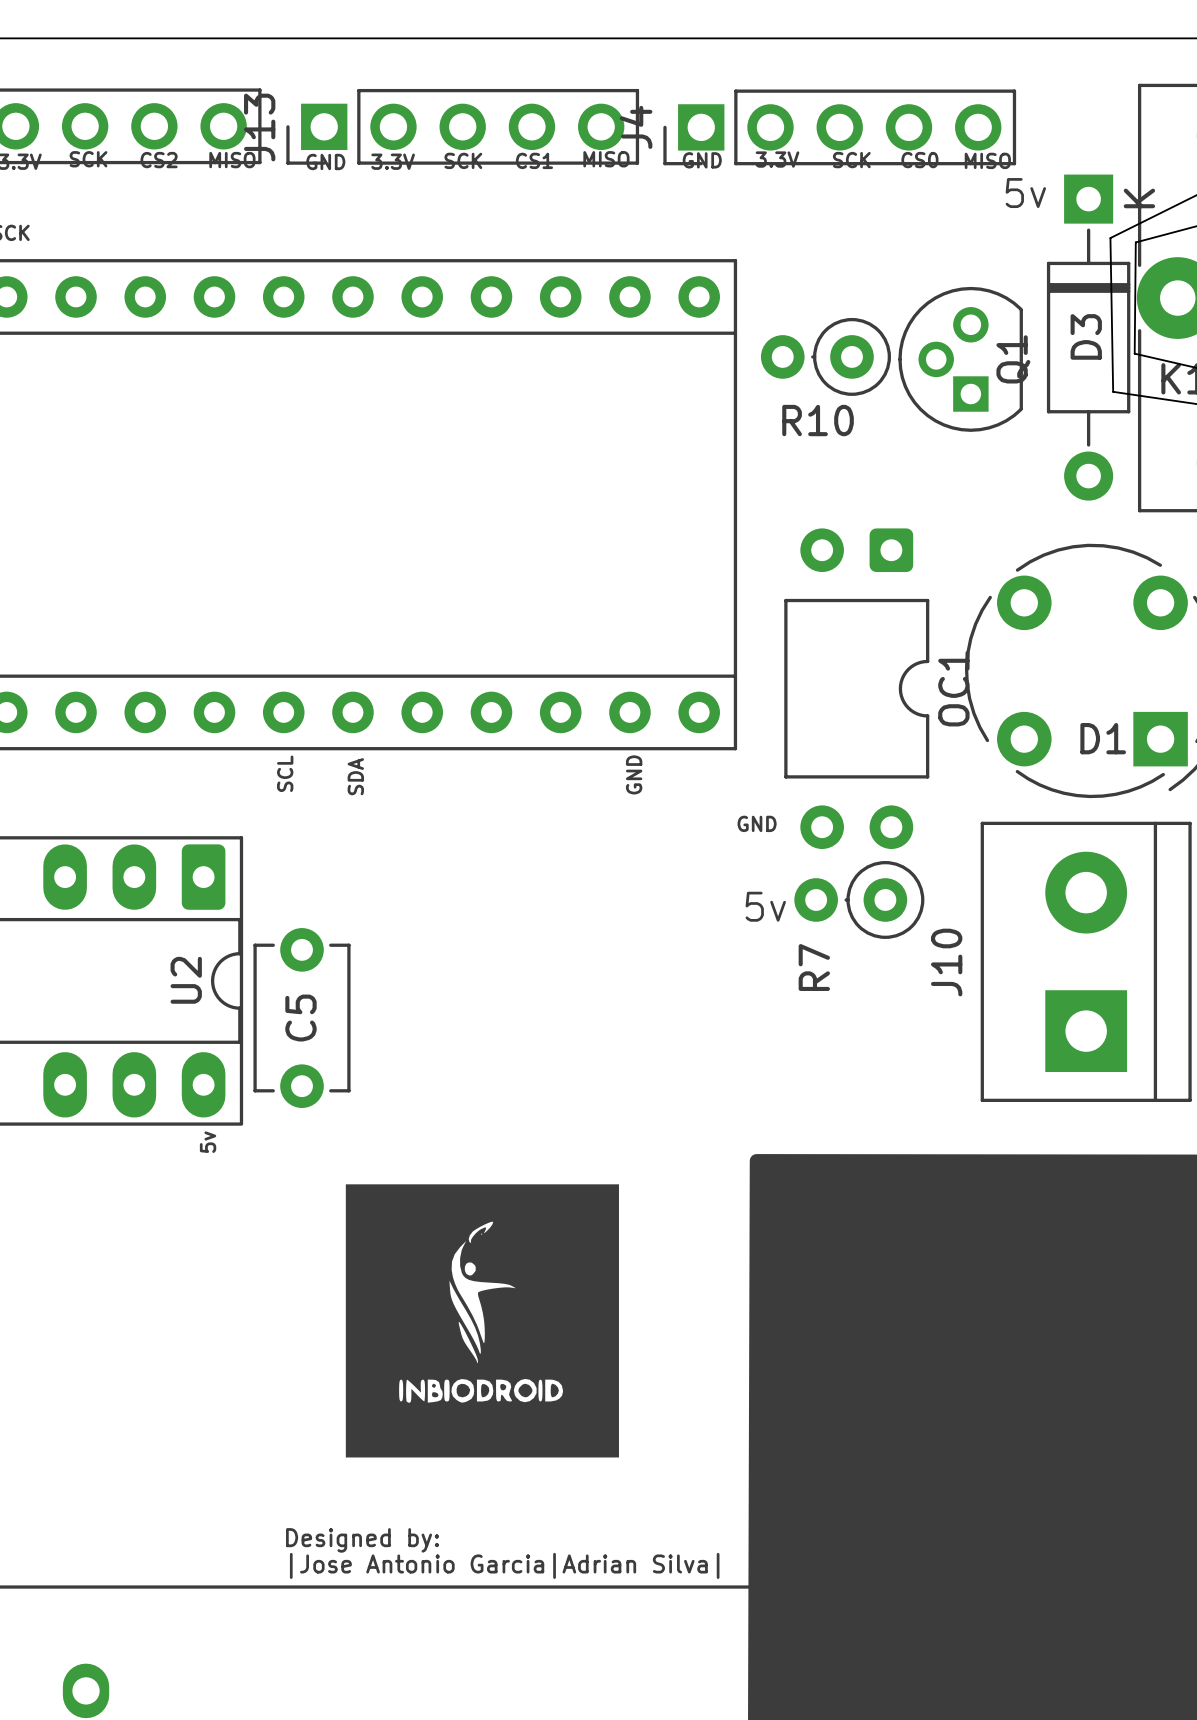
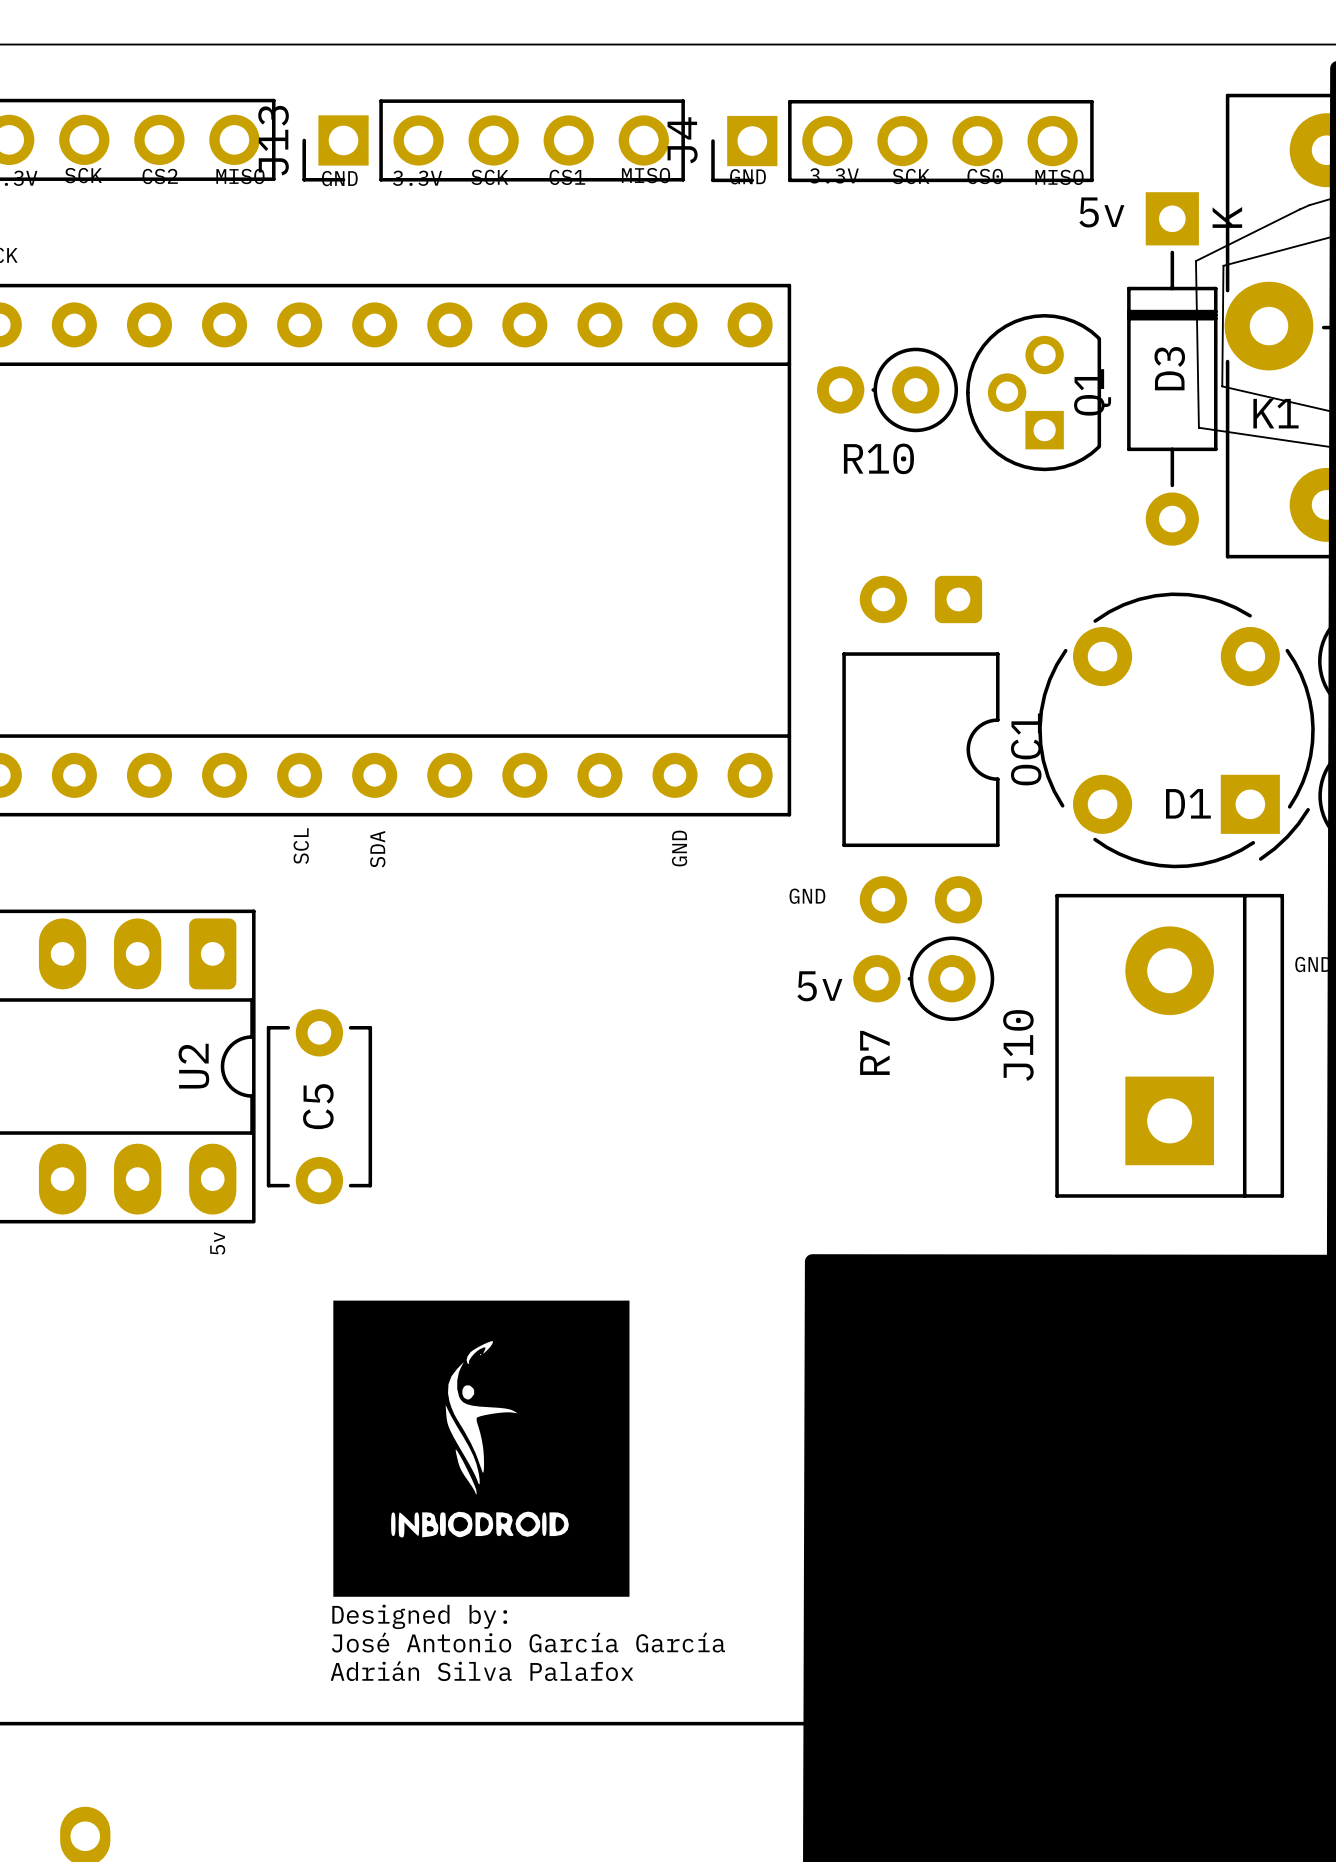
drawing position: (482, 1320) -> (481, 1448)
text: none -> José Antonio García García (528, 1642)
text: none -> Adrián Silva Palafox (482, 1671)
text position: Designed by: (362, 1540) -> Designed by: (419, 1616)
text: |Jose Antonio Garcia|Adrian Silva| (504, 1565) -> none

